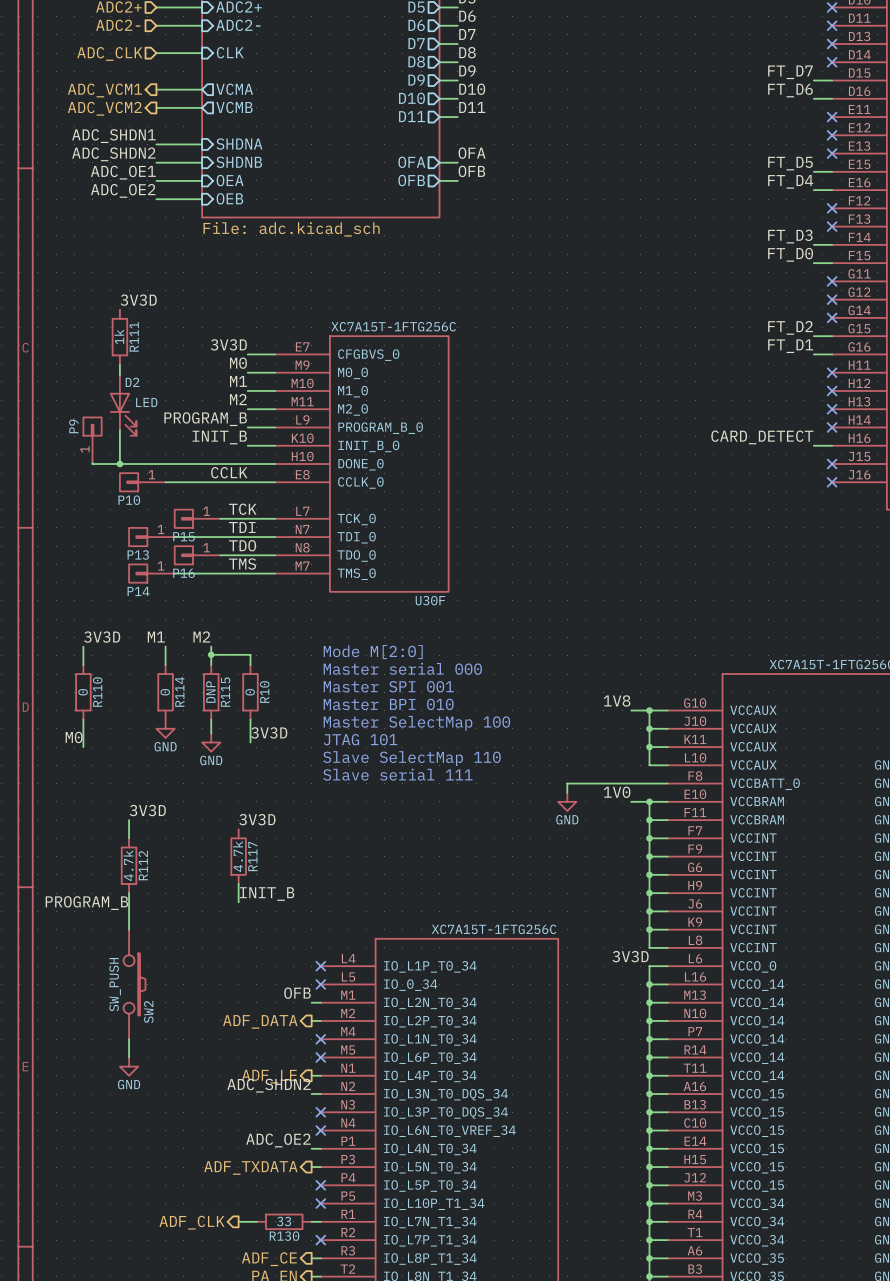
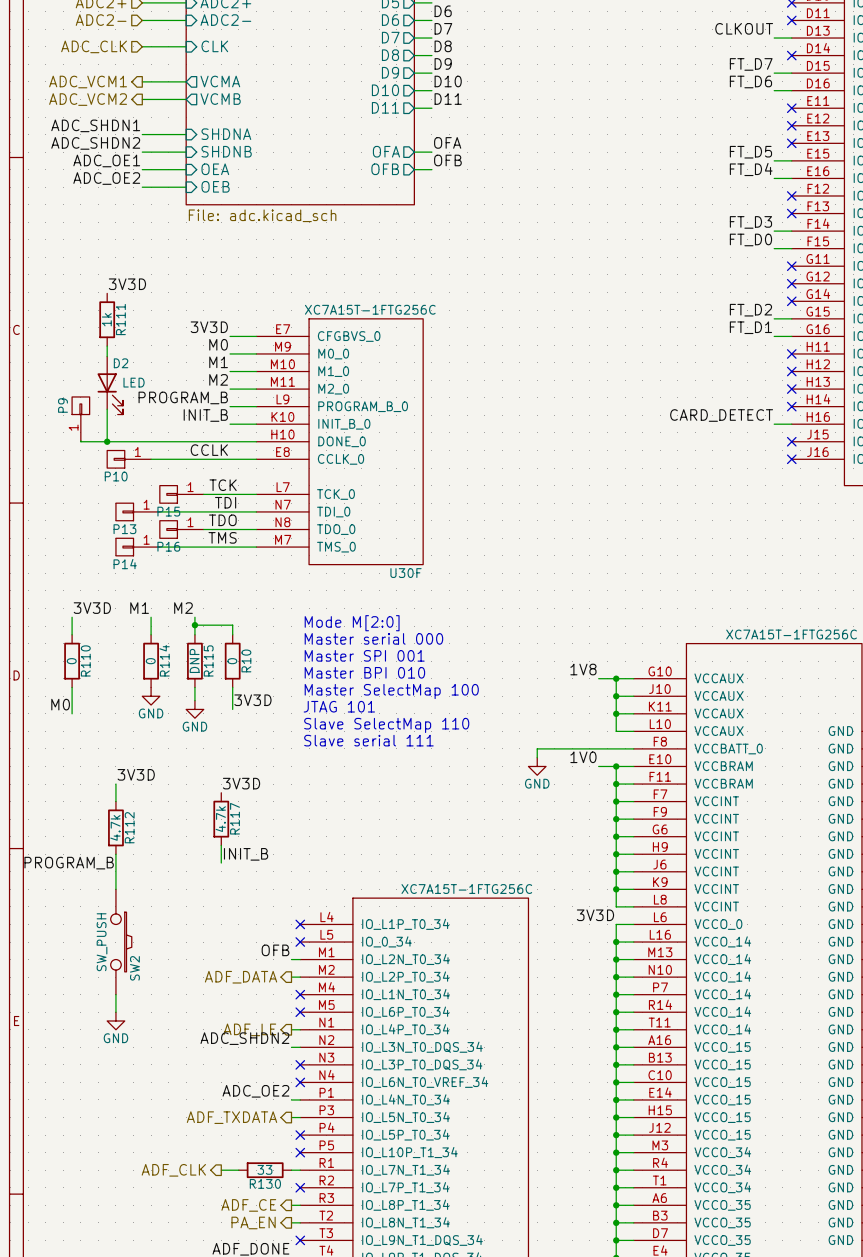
label: none -> CLKOUT (744, 28)
wire: none -> (774, 38) (791, 38)
no-connect mark: (832, 44) -> none

